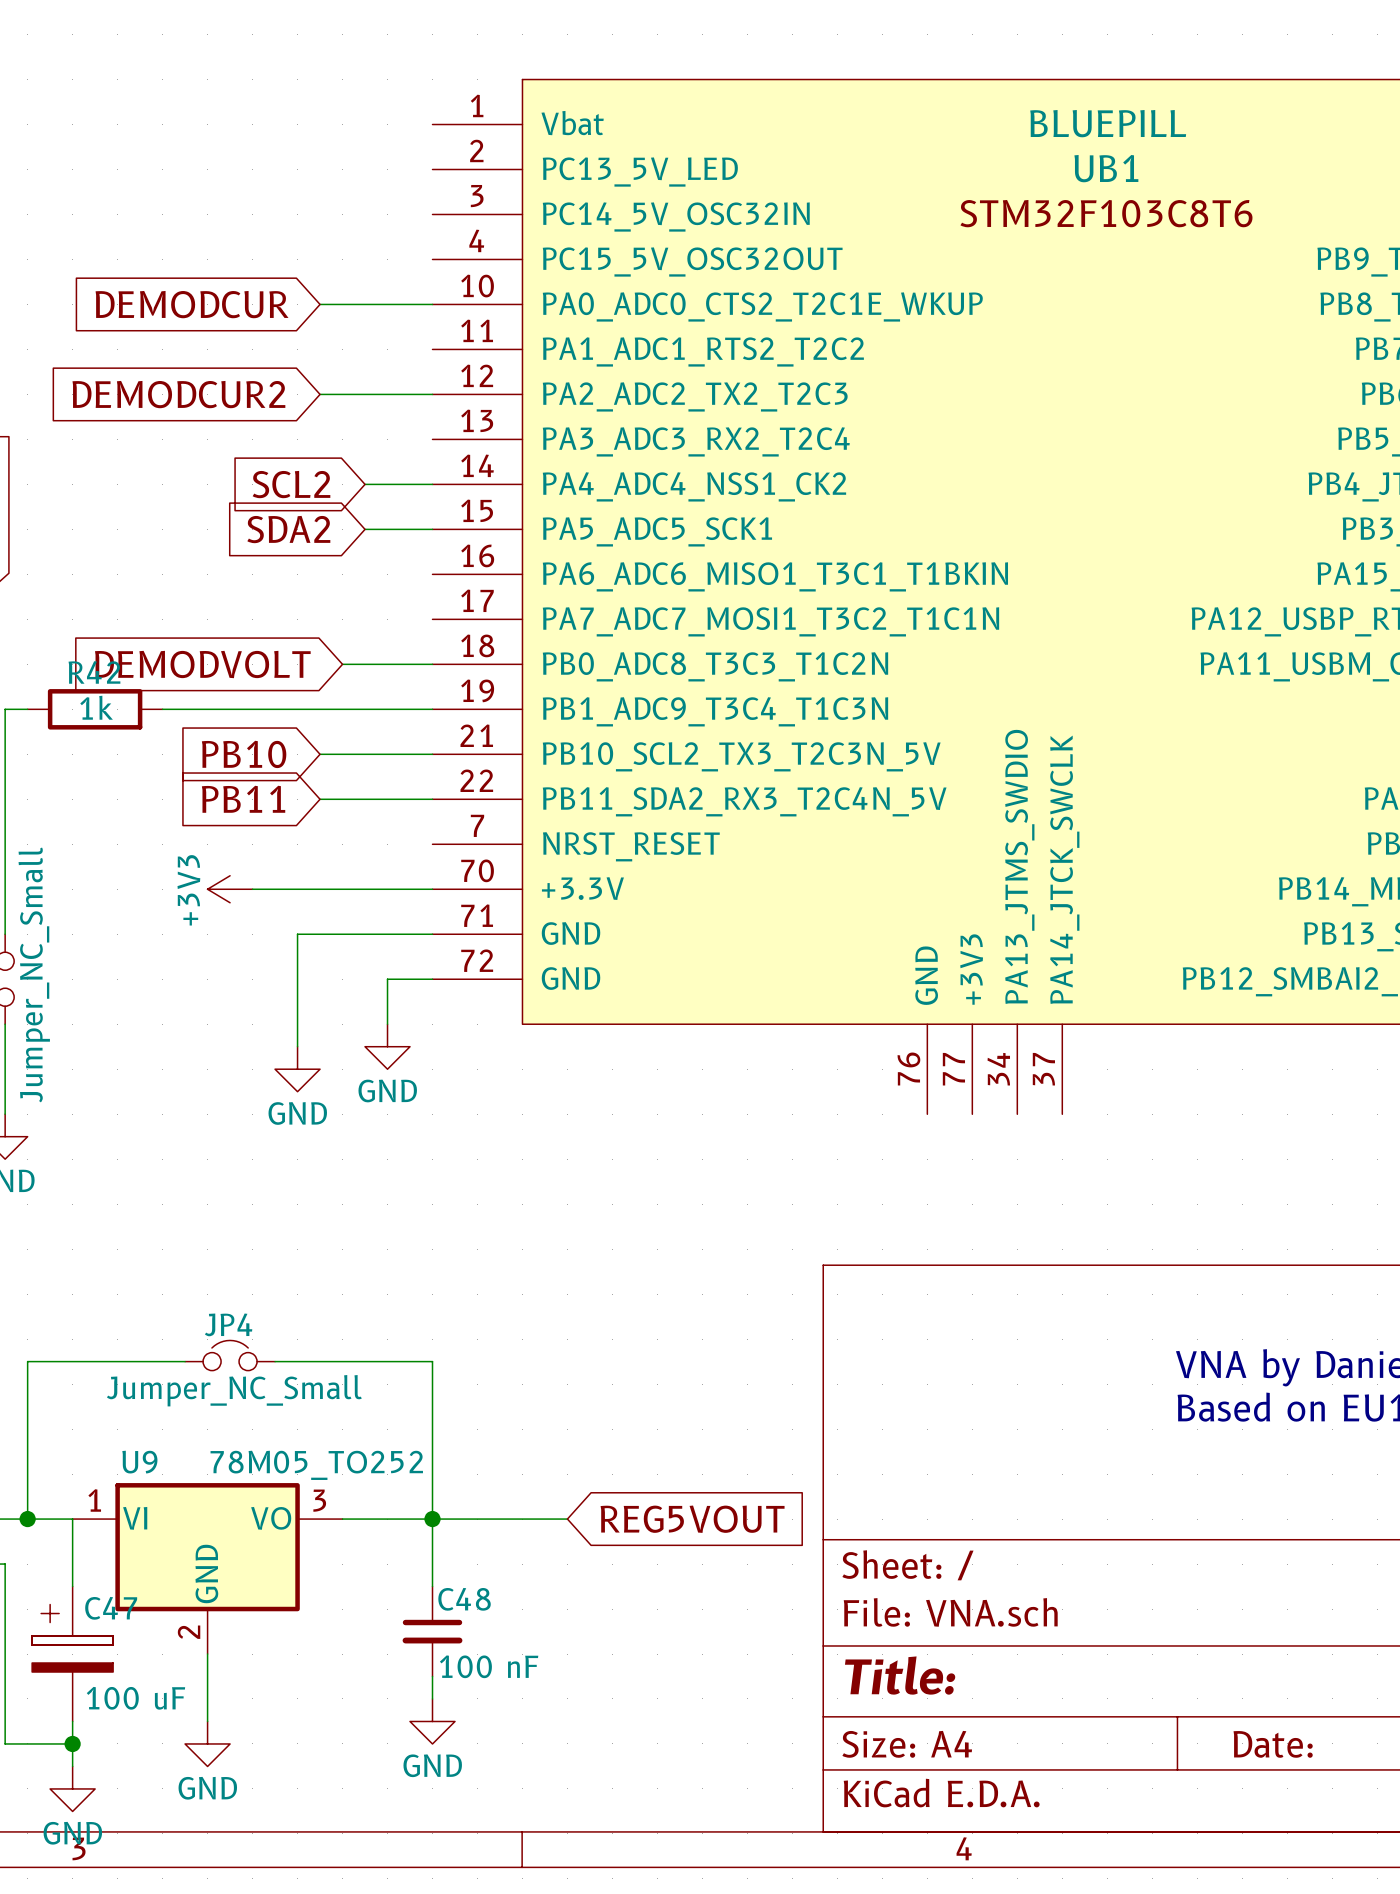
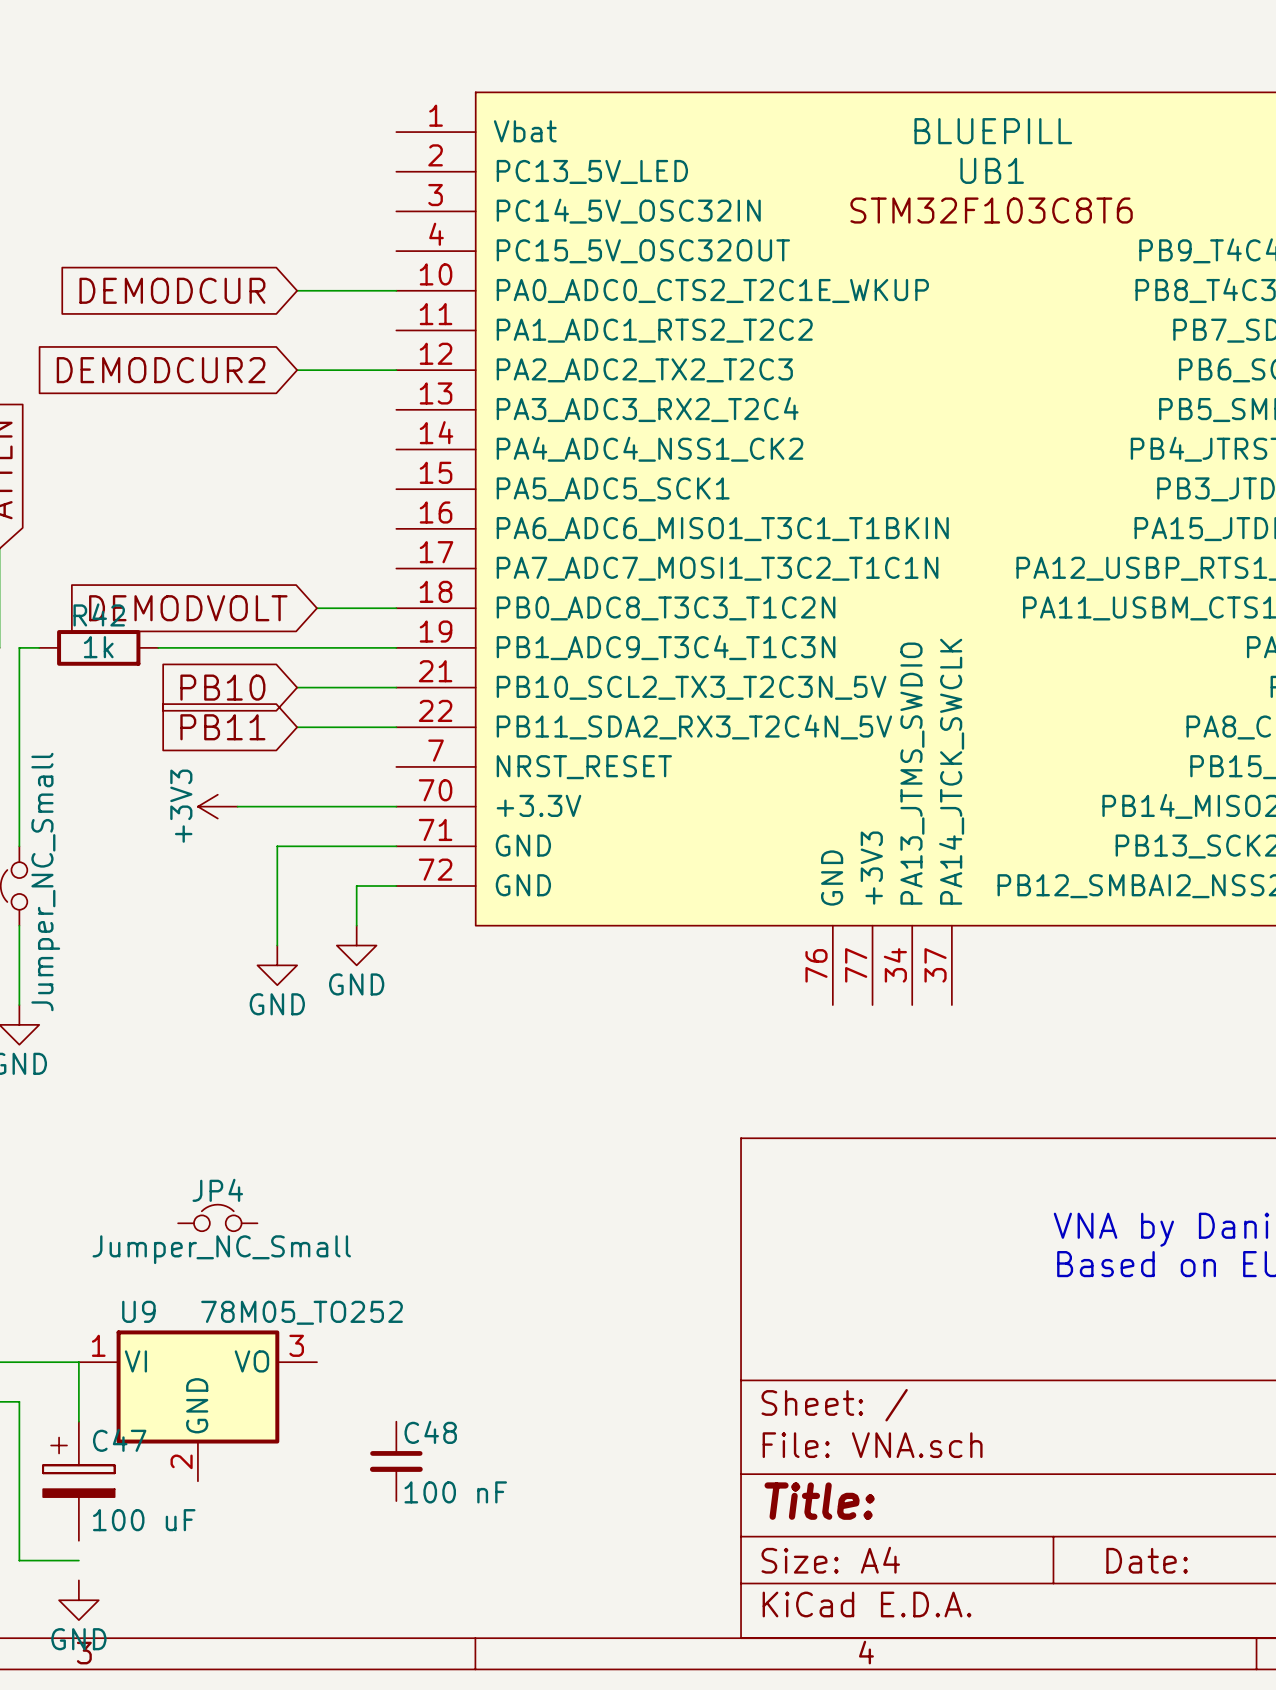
global label: SCL2 (291, 484) -> none
wire: (365, 484) (432, 484) -> none
global label: SDA2 (288, 529) -> none
wire: (365, 529) (432, 529) -> none
wire: (185, 1361) (27, 1361) (27, 1519) -> none
wire: (275, 1361) (432, 1361) (432, 1586) -> none
junction: (27, 1519) -> none
wire: (342, 1519) (567, 1519) -> none
junction: (432, 1519) -> none
global label: REG5VOUT (692, 1519) -> none
wire: (207, 1654) (207, 1721) -> none
wire: (432, 1676) (432, 1698) -> none
wire: (72, 1721) (72, 1766) -> none
power symbol: GND (432, 1721) -> none
junction: (72, 1743) -> none
power symbol: GND (207, 1743) -> none

